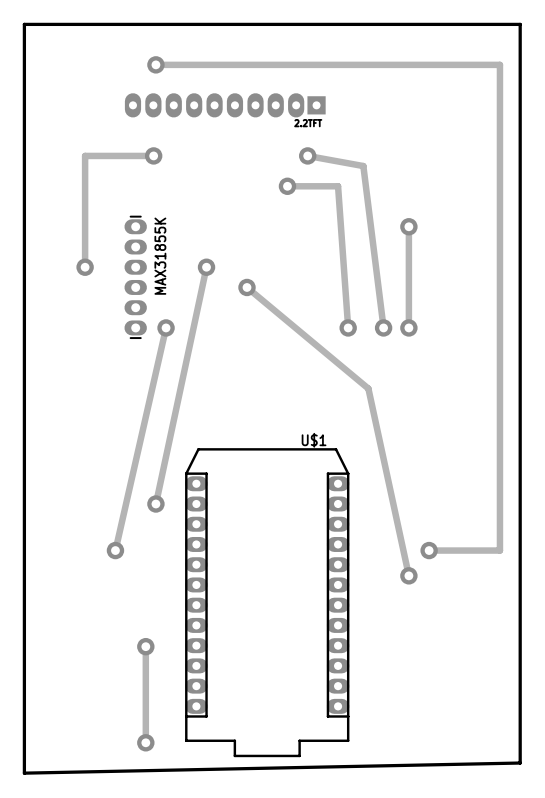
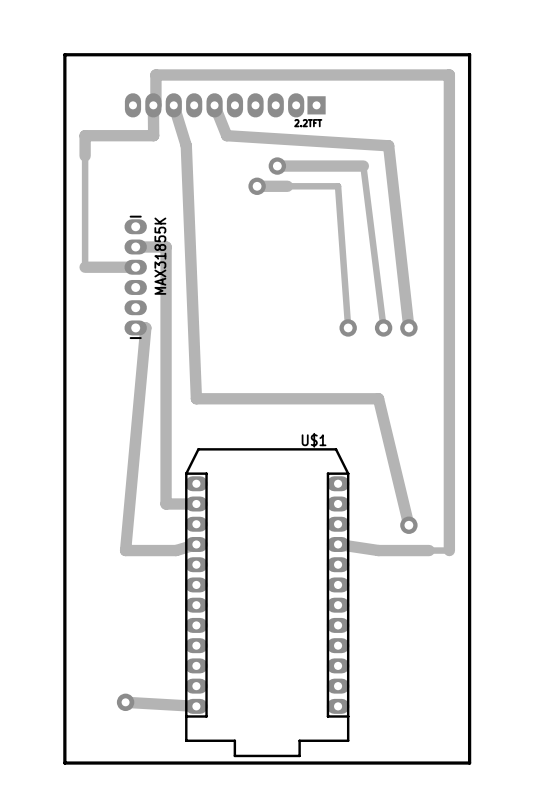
board edge: (24, 24) (24, 773) (520, 763) (520, 24) (24, 24) -> (64, 54) (64, 763) (469, 763) (469, 54) (64, 54)
track: (155, 64) (499, 64) (499, 550) (449, 550) -> (85, 155) (85, 135) (153, 135) (155, 74) (449, 74) (449, 550)
via: (155, 64) -> none
track: none -> (173, 105) (186, 145) (196, 398) (378, 398) (408, 525)
track: (85, 155) (153, 155) -> none
via: (153, 155) -> none
track: (307, 155) (363, 166) -> (277, 166) (363, 166)
via: (307, 155) -> none
via: none -> (277, 166)
track: none -> (257, 186) (287, 186)
via: none -> (257, 186)
via: (287, 186) -> none
track: (408, 226) (408, 327) -> (214, 105) (226, 135) (388, 145) (408, 327)
via: (408, 226) -> none
track: none -> (135, 247) (166, 247) (166, 504) (196, 504)
track: none -> (85, 267) (135, 267)
via: (85, 267) -> none
track: (206, 267) (155, 504) -> none
via: (206, 267) -> none
track: (247, 287) (368, 388) (408, 575) -> none
via: (247, 287) -> none
track: none -> (135, 327) (145, 327) (125, 550) (176, 550) (196, 544)
track: (166, 327) (115, 550) -> none
via: (166, 327) -> none
via: (155, 504) -> none
via: none -> (408, 525)
track: none -> (338, 544) (378, 550) (429, 550)
via: (115, 550) -> none
via: (429, 550) -> none
via: (408, 575) -> none
track: (145, 646) (145, 742) -> none
via: (145, 646) -> none
track: none -> (125, 702) (196, 706)
via: none -> (125, 702)
via: (145, 742) -> none

